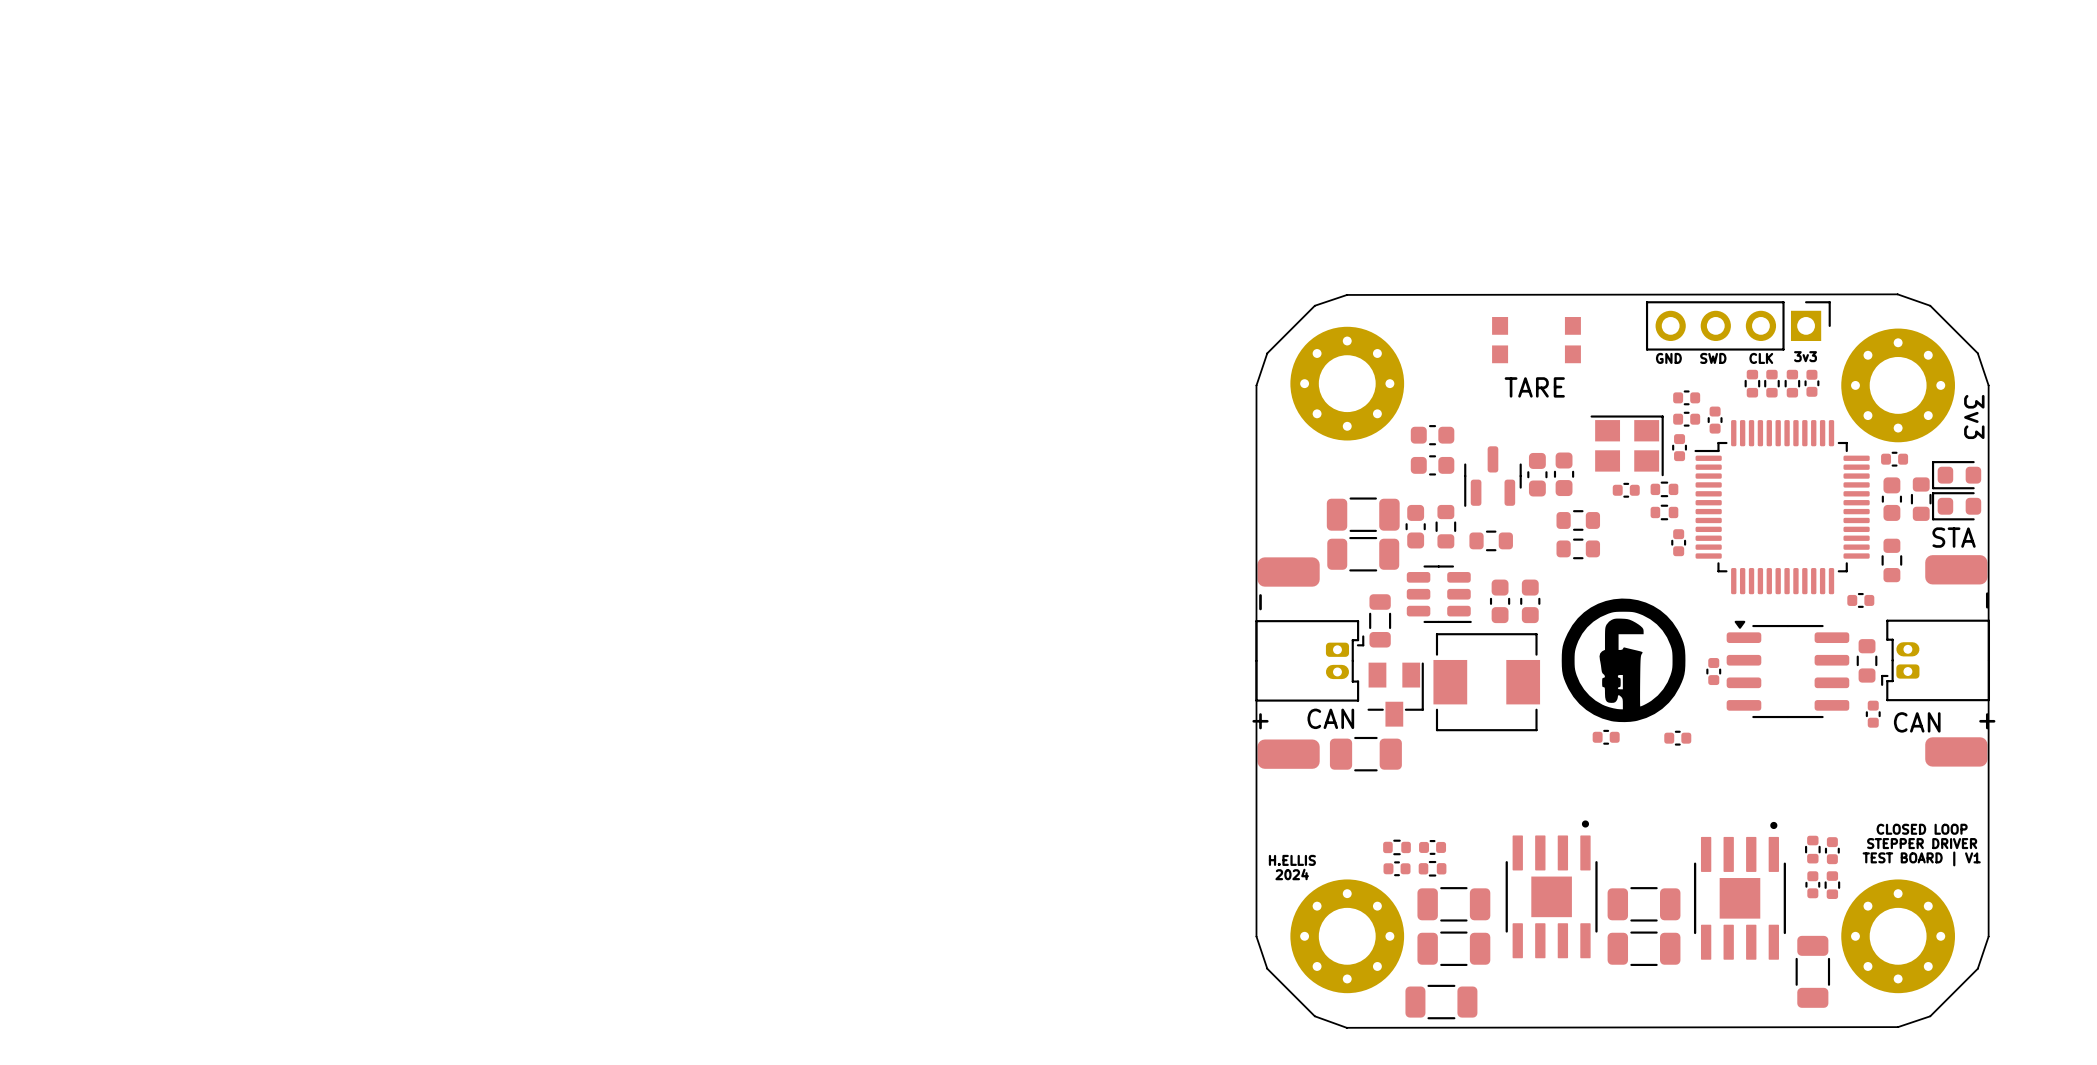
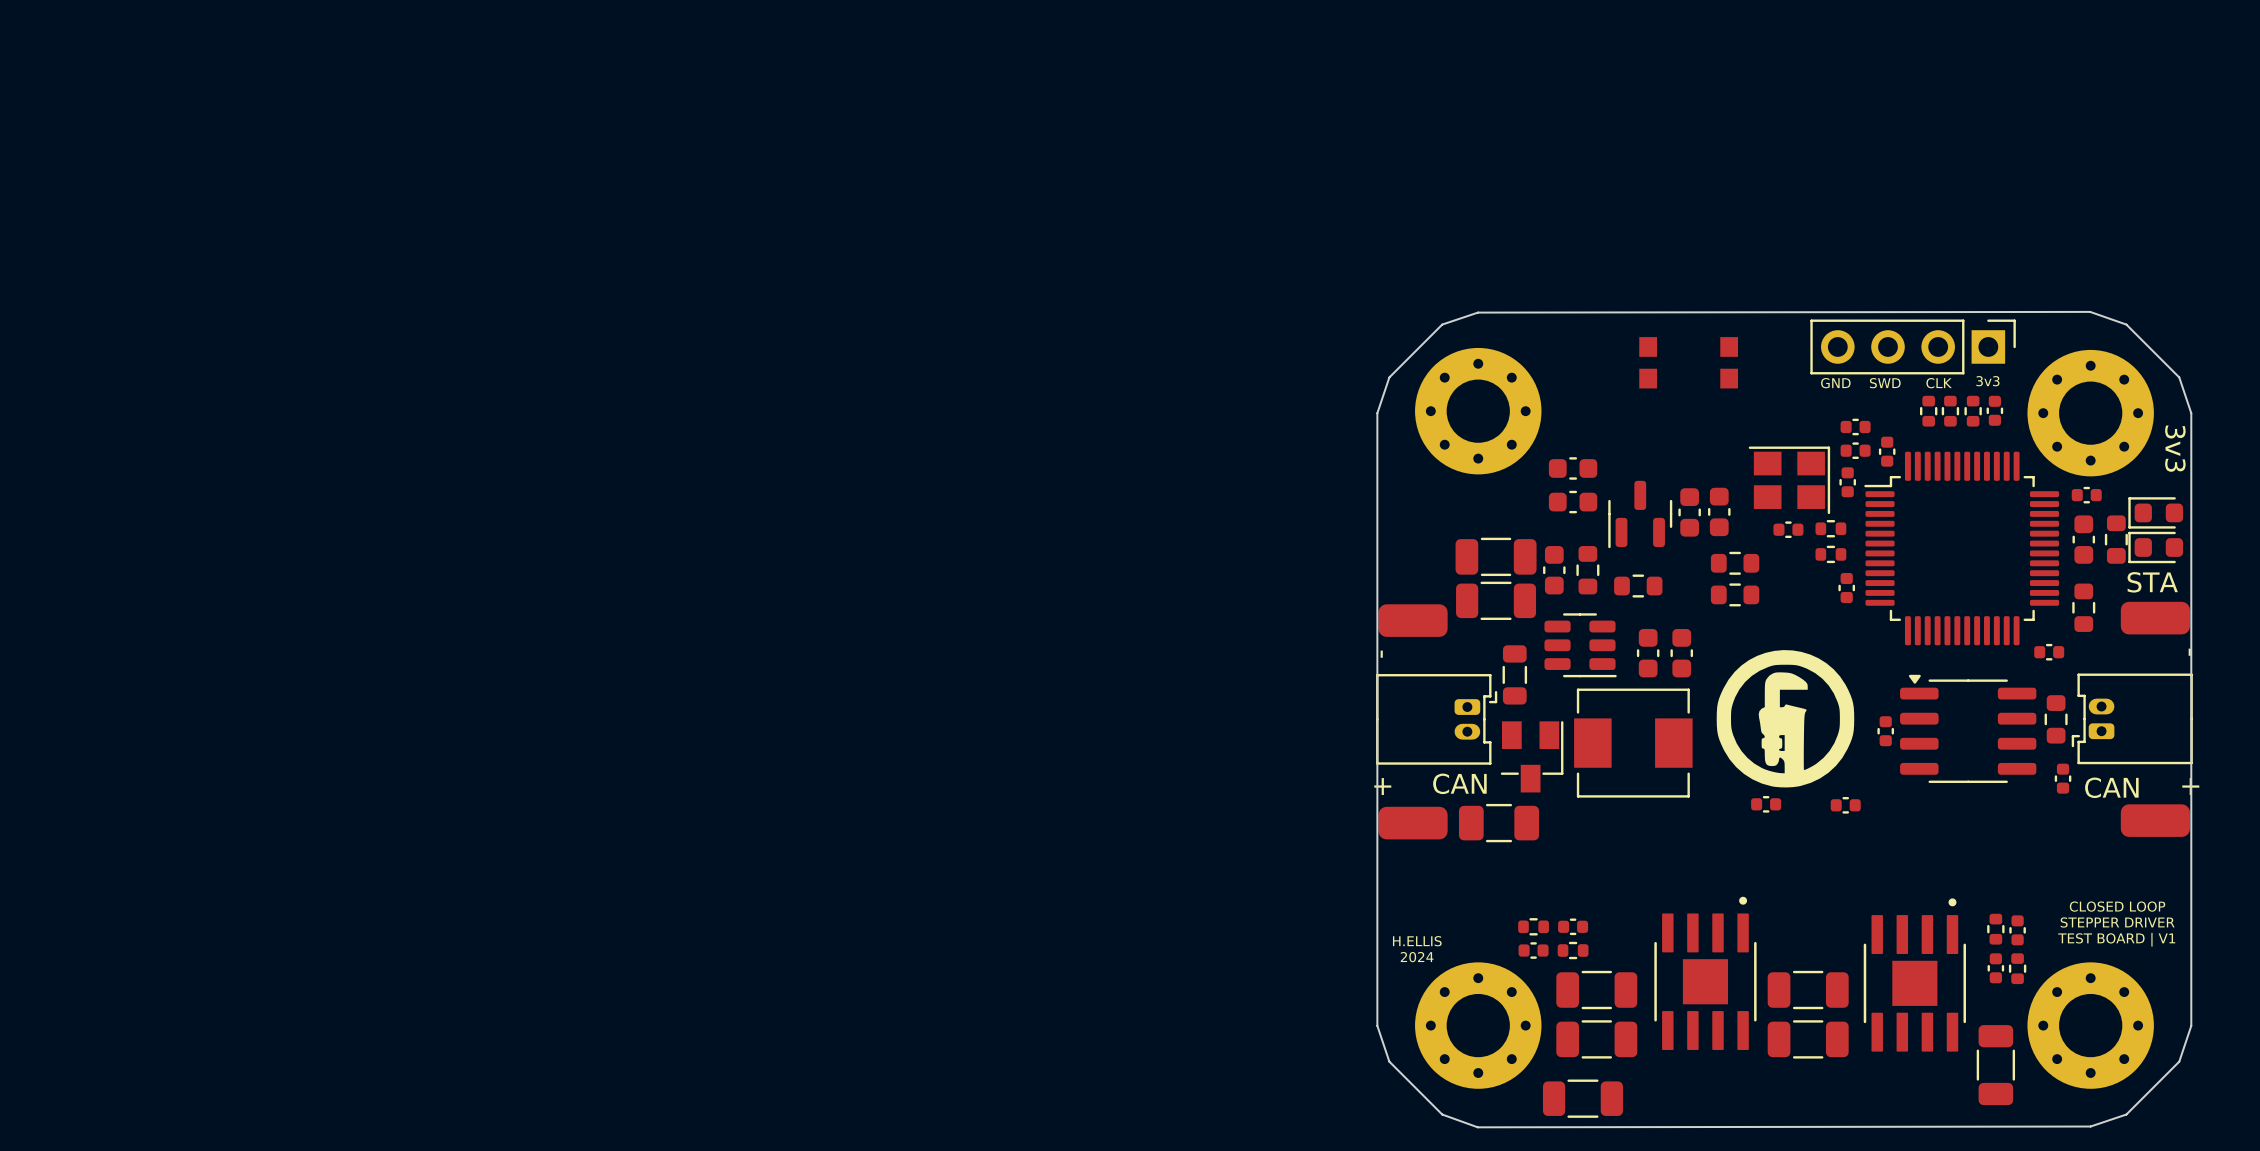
text: TARE (1534, 387) -> none

